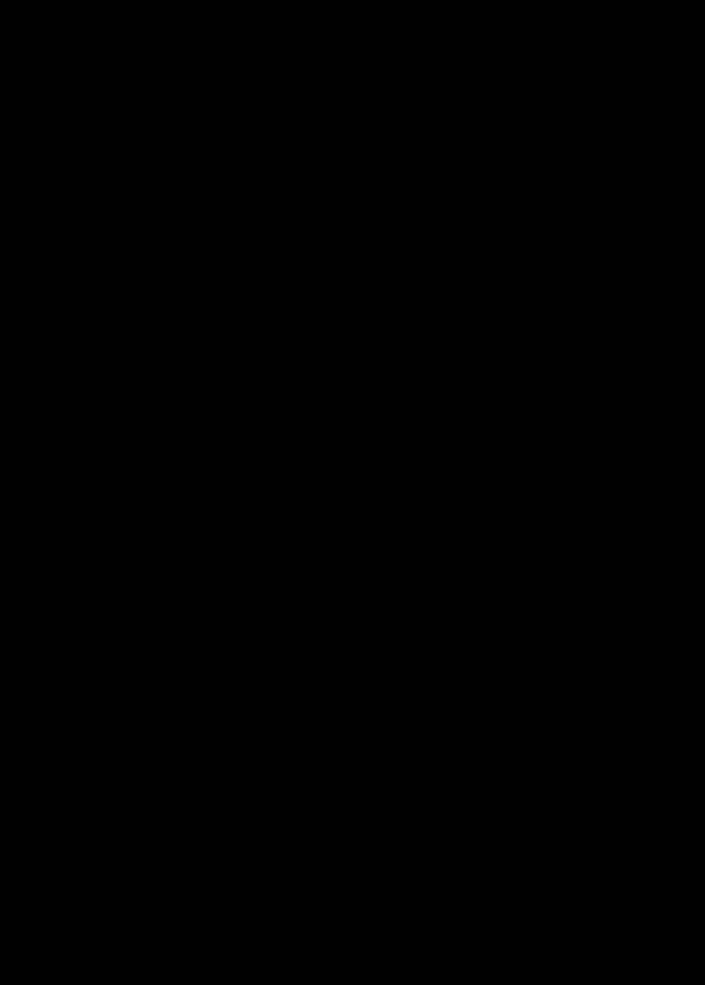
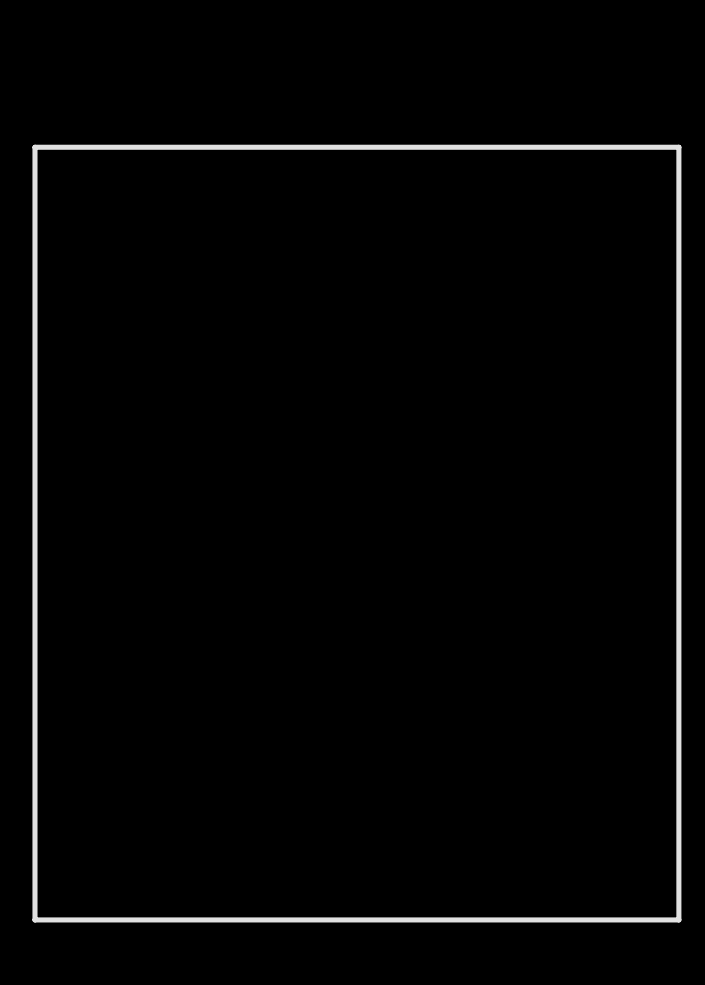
line: none -> (34, 147) (678, 147) (678, 919) (34, 919) (34, 147)

